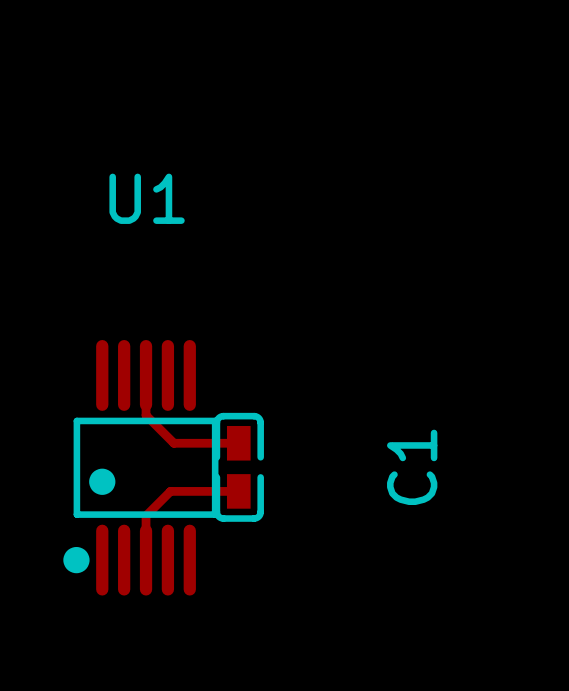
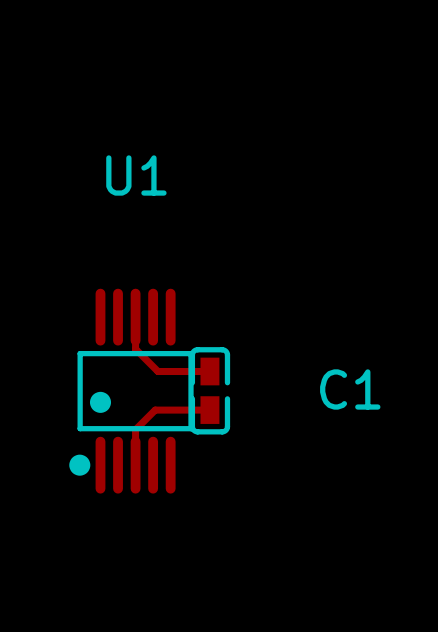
C1 name rotation: 0° (412, 467) -> 90° clockwise (350, 389)

